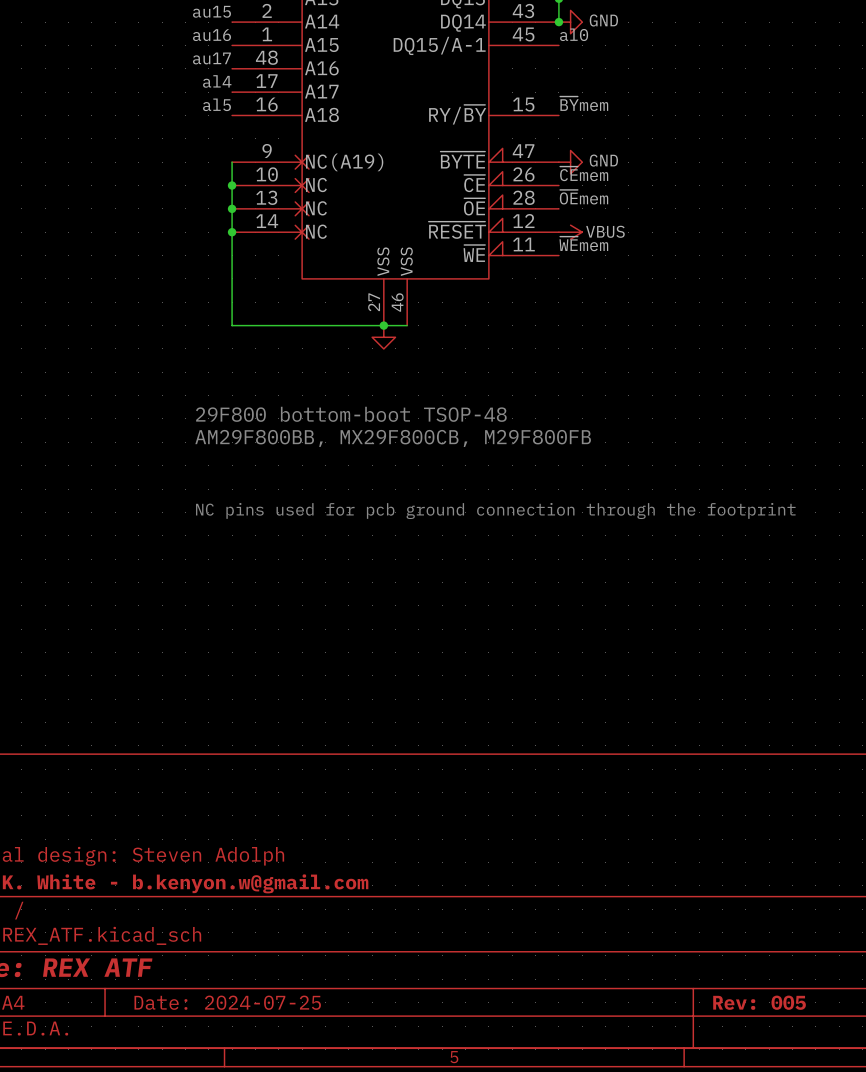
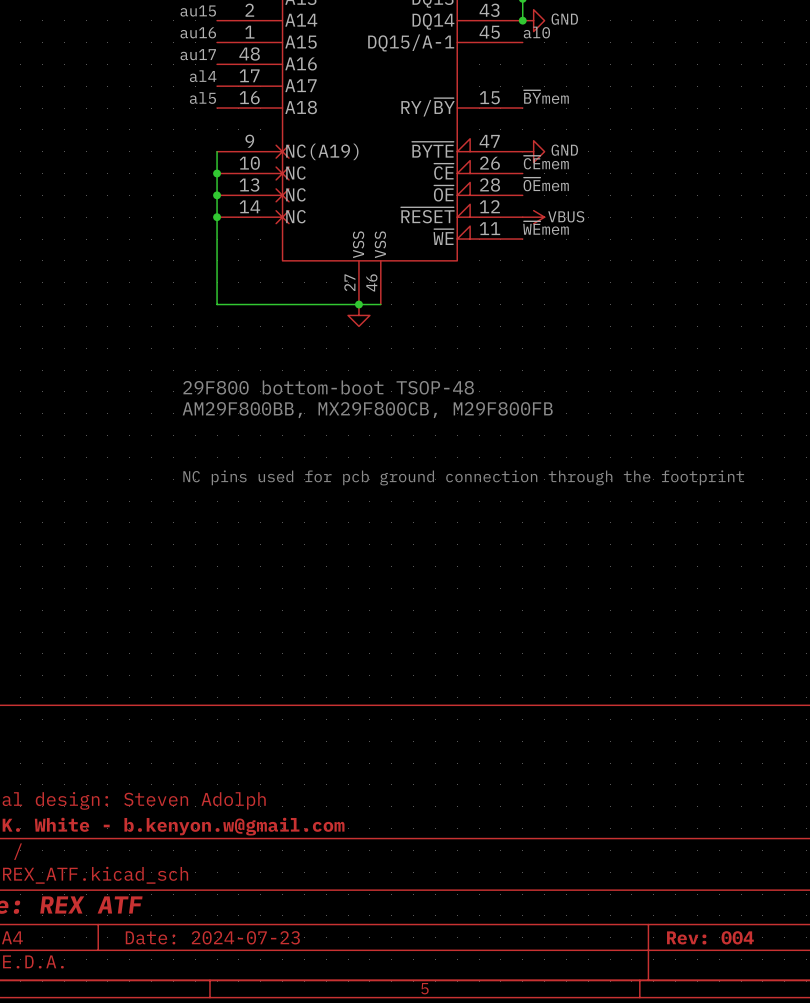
title block: Date: 2024-07-25 (227, 1002) -> Date: 2024-07-23 (212, 937)
title block: Rev: 005 (759, 1002) -> Rev: 004 (710, 937)

